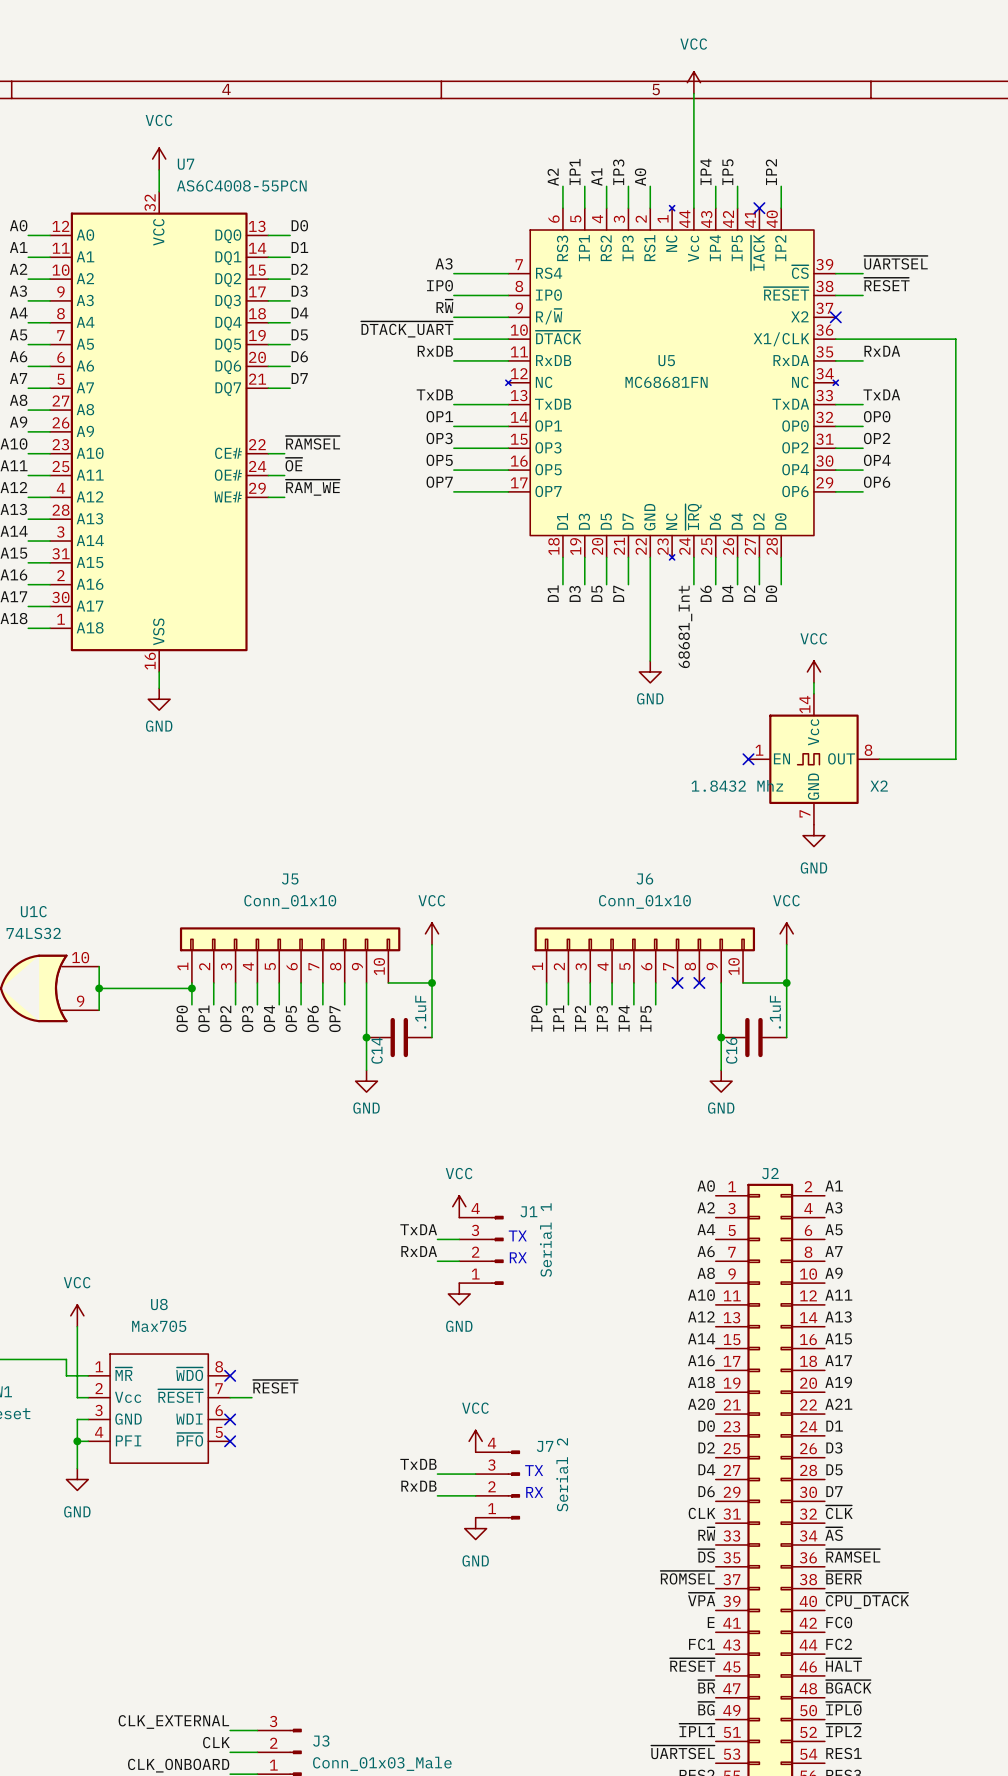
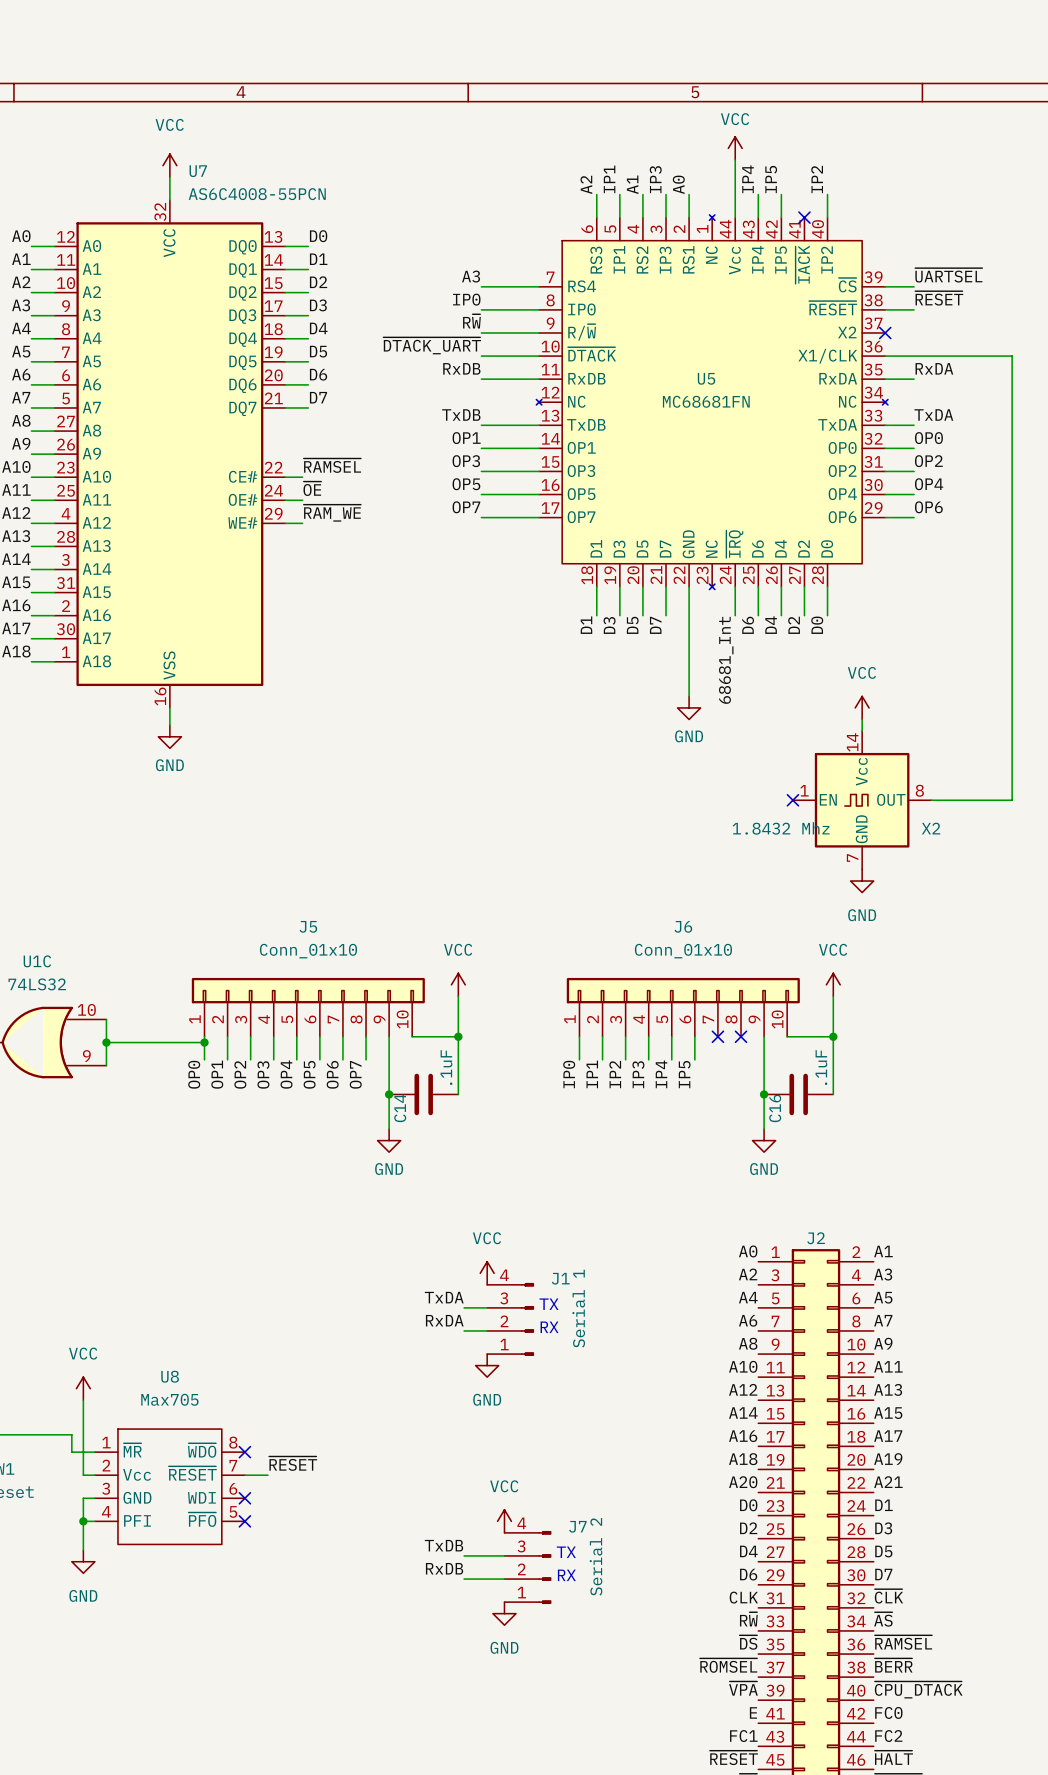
power symbol text position: VCC (693, 44) -> VCC (735, 119)
power symbol position: VCC (693, 82) -> VCC (735, 148)
wire: (693, 93) (693, 153) -> none

